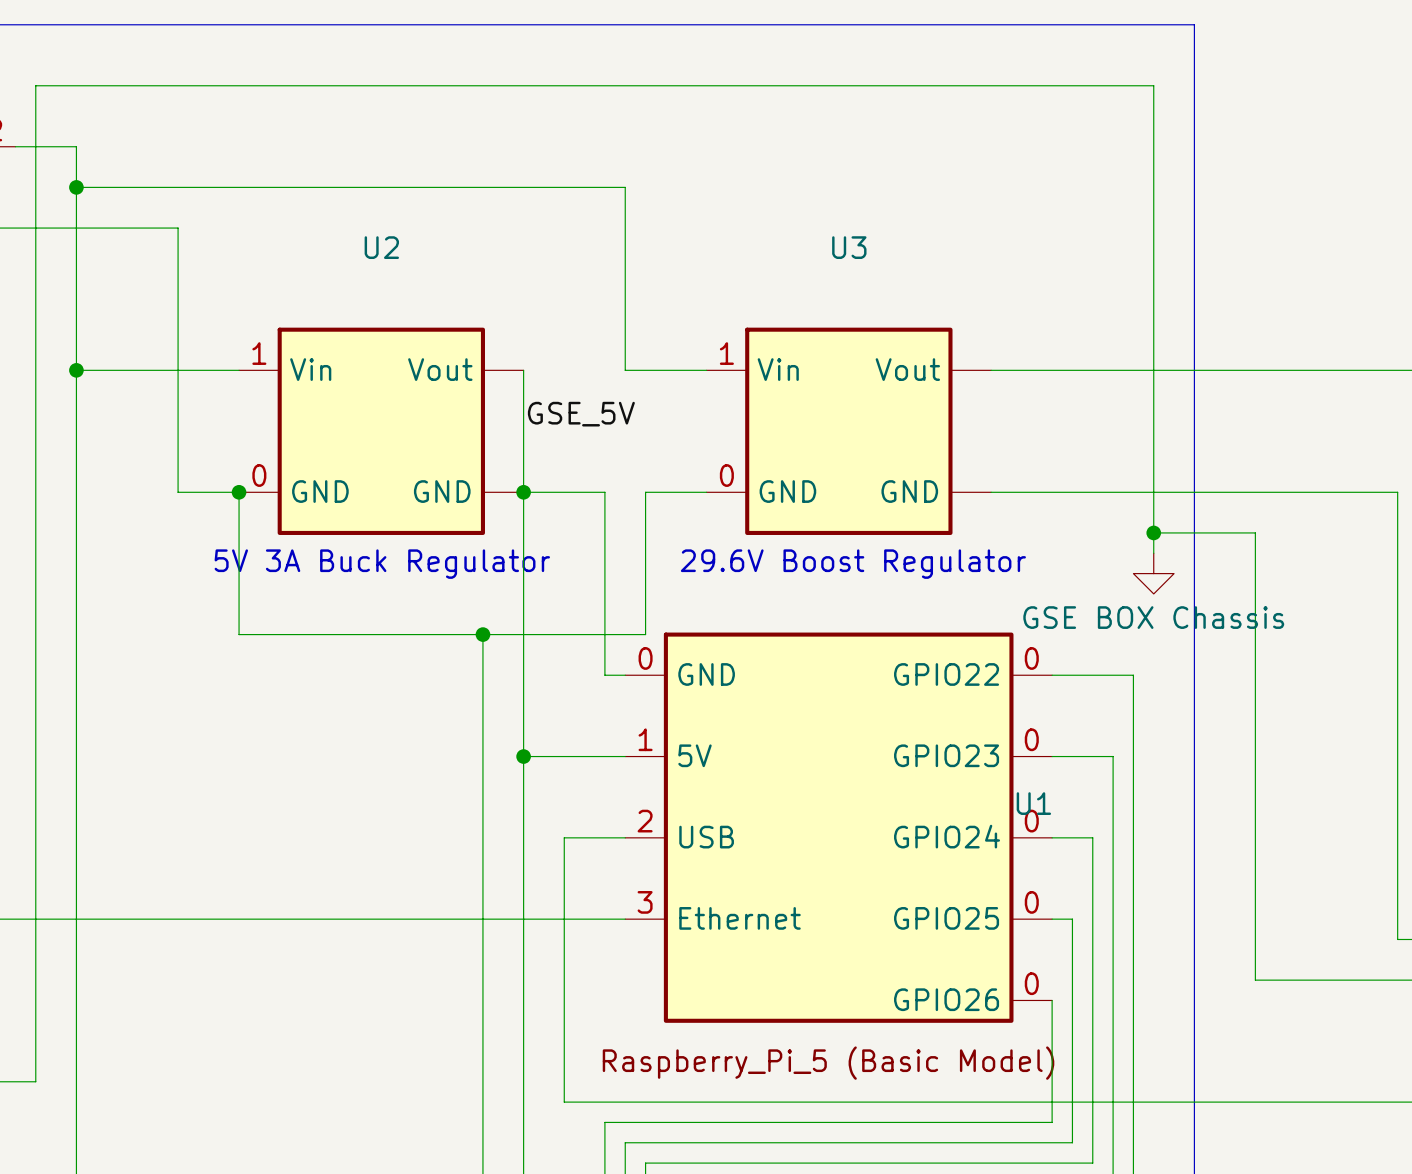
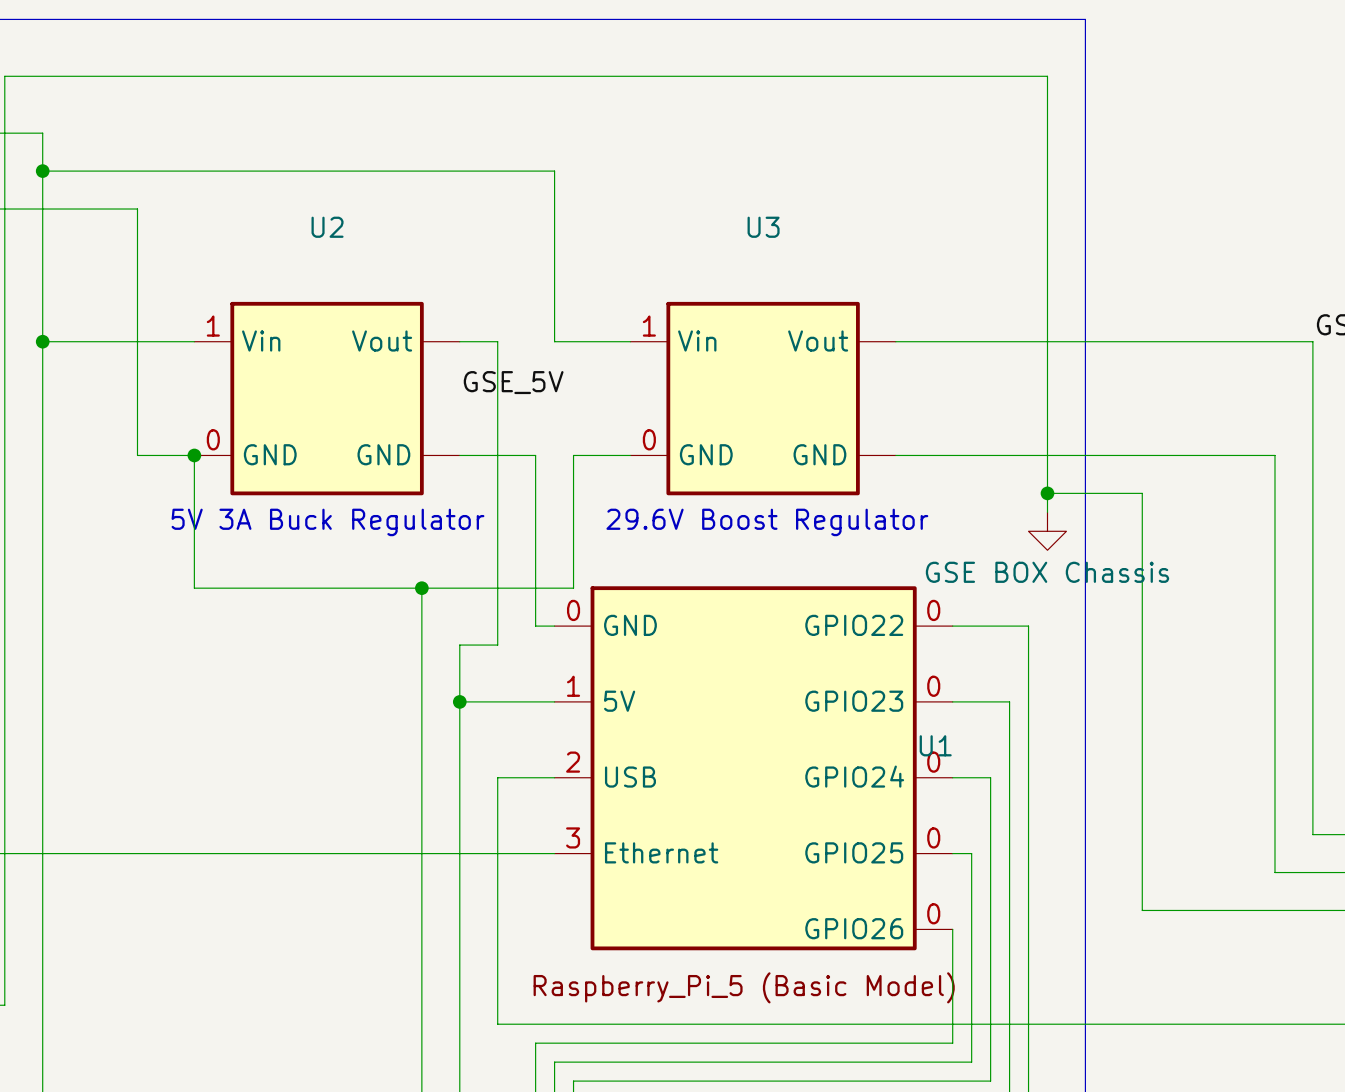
wire: (523, 370) (523, 695) -> (459, 341) (497, 341) (497, 645) (459, 645)
junction: (523, 492) -> none

